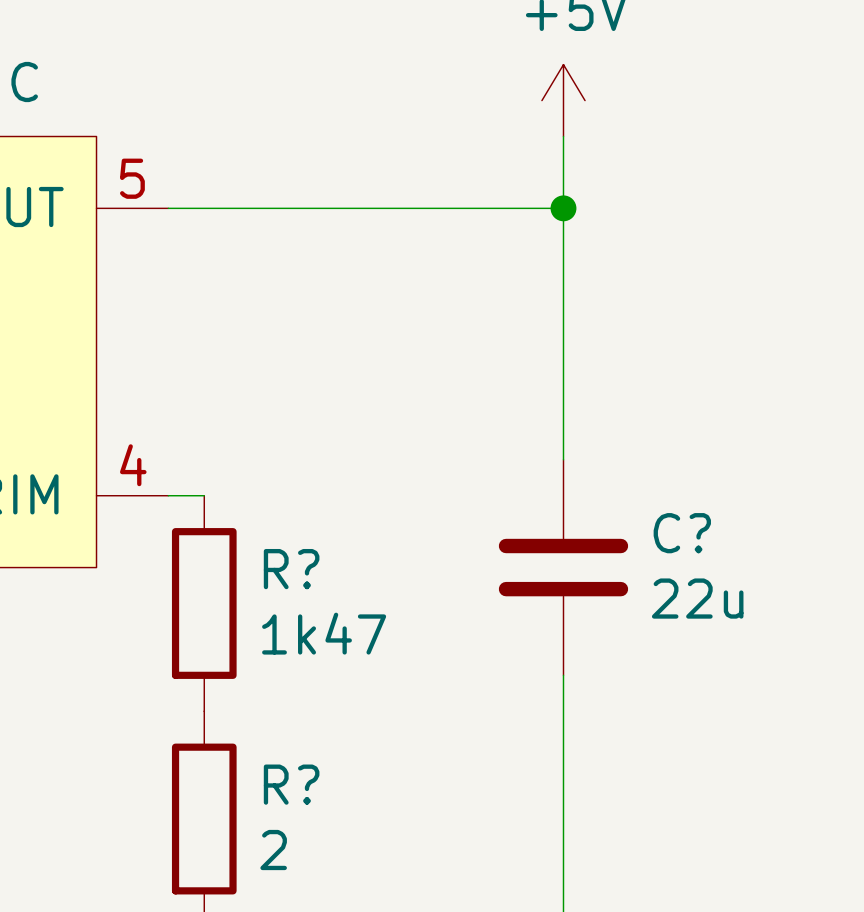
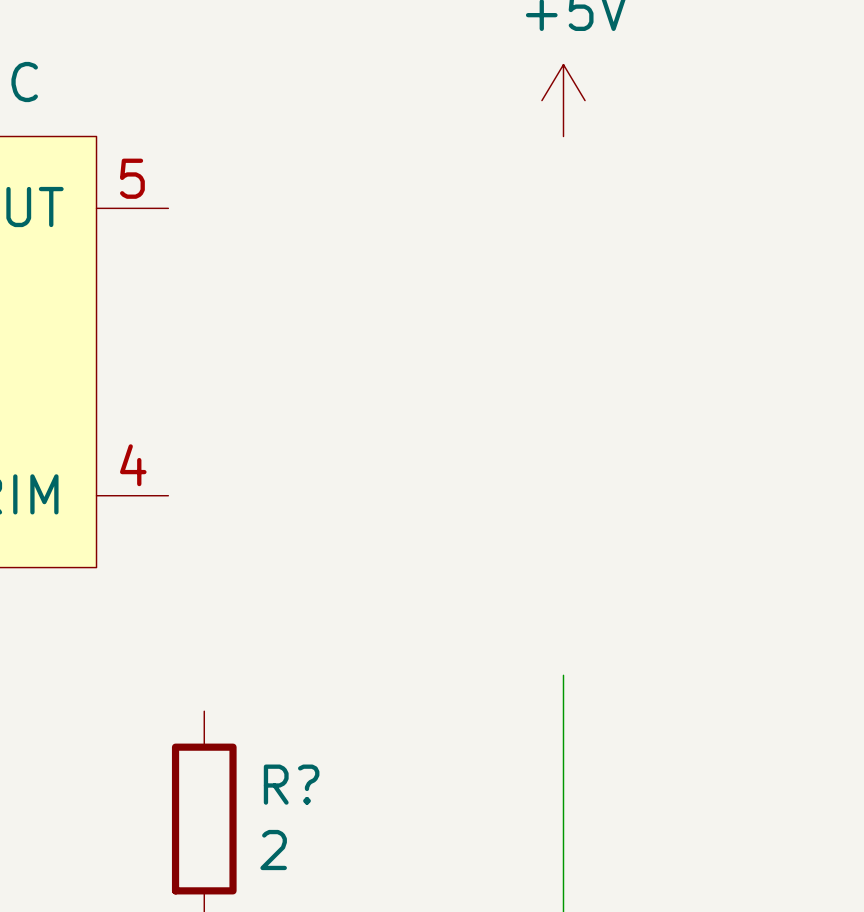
wire: (563, 136) (563, 459) -> none
wire: (168, 208) (563, 208) -> none
junction: (563, 208) -> none
wire: (168, 495) (204, 495) -> none
C?: 22u (563, 567) -> none
R?: 1k47 (204, 603) -> none

